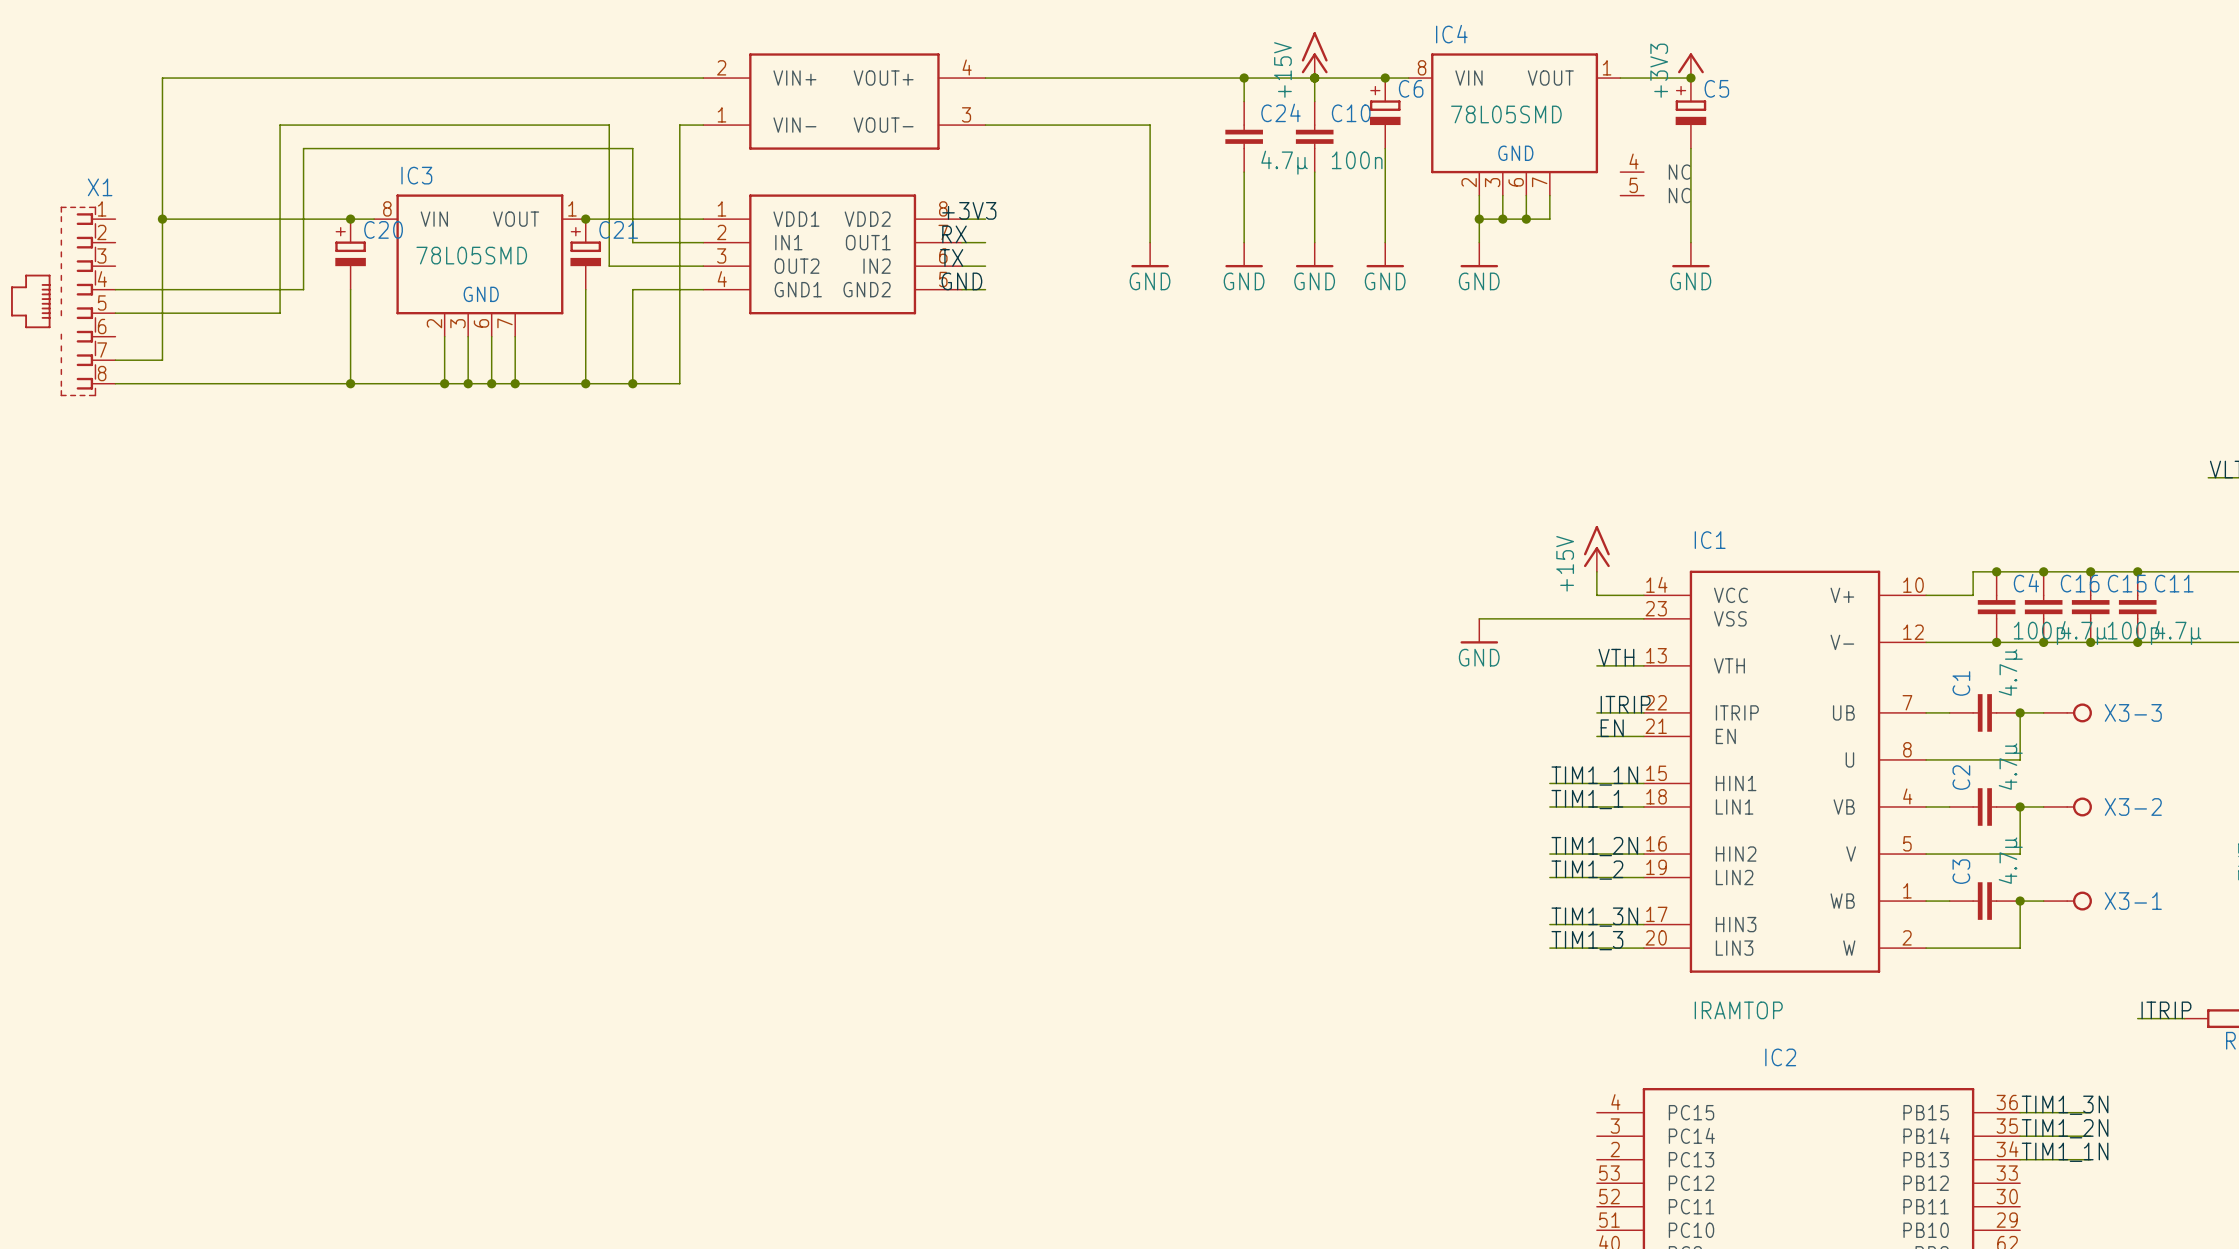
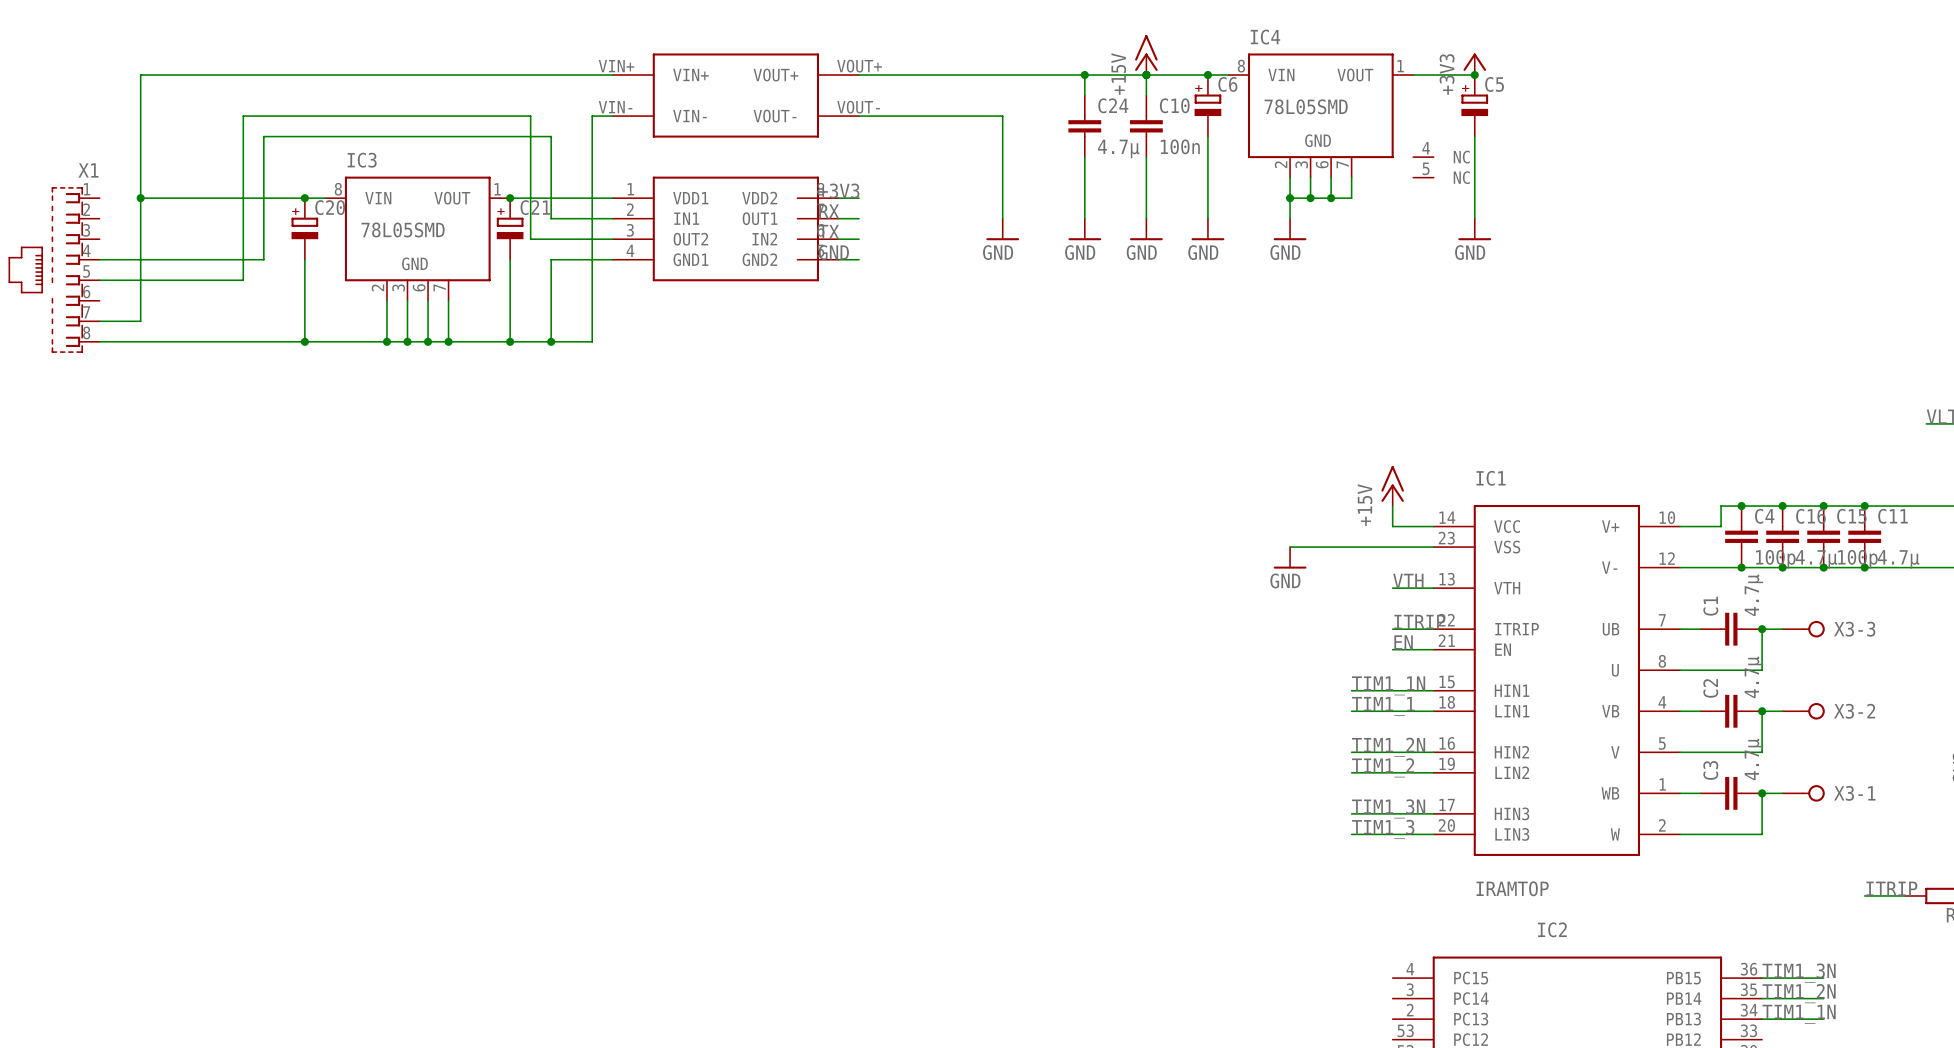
part pin number: 2 (721, 67) -> VIN+ (616, 66)
part pin number: 4 (967, 67) -> VOUT+ (859, 66)
part pin number: 1 (721, 114) -> VIN- (615, 107)
part pin number: 3 (966, 114) -> VOUT- (858, 107)
part symbol: [703, 194, 962, 315] -> [612, 176, 839, 282]

